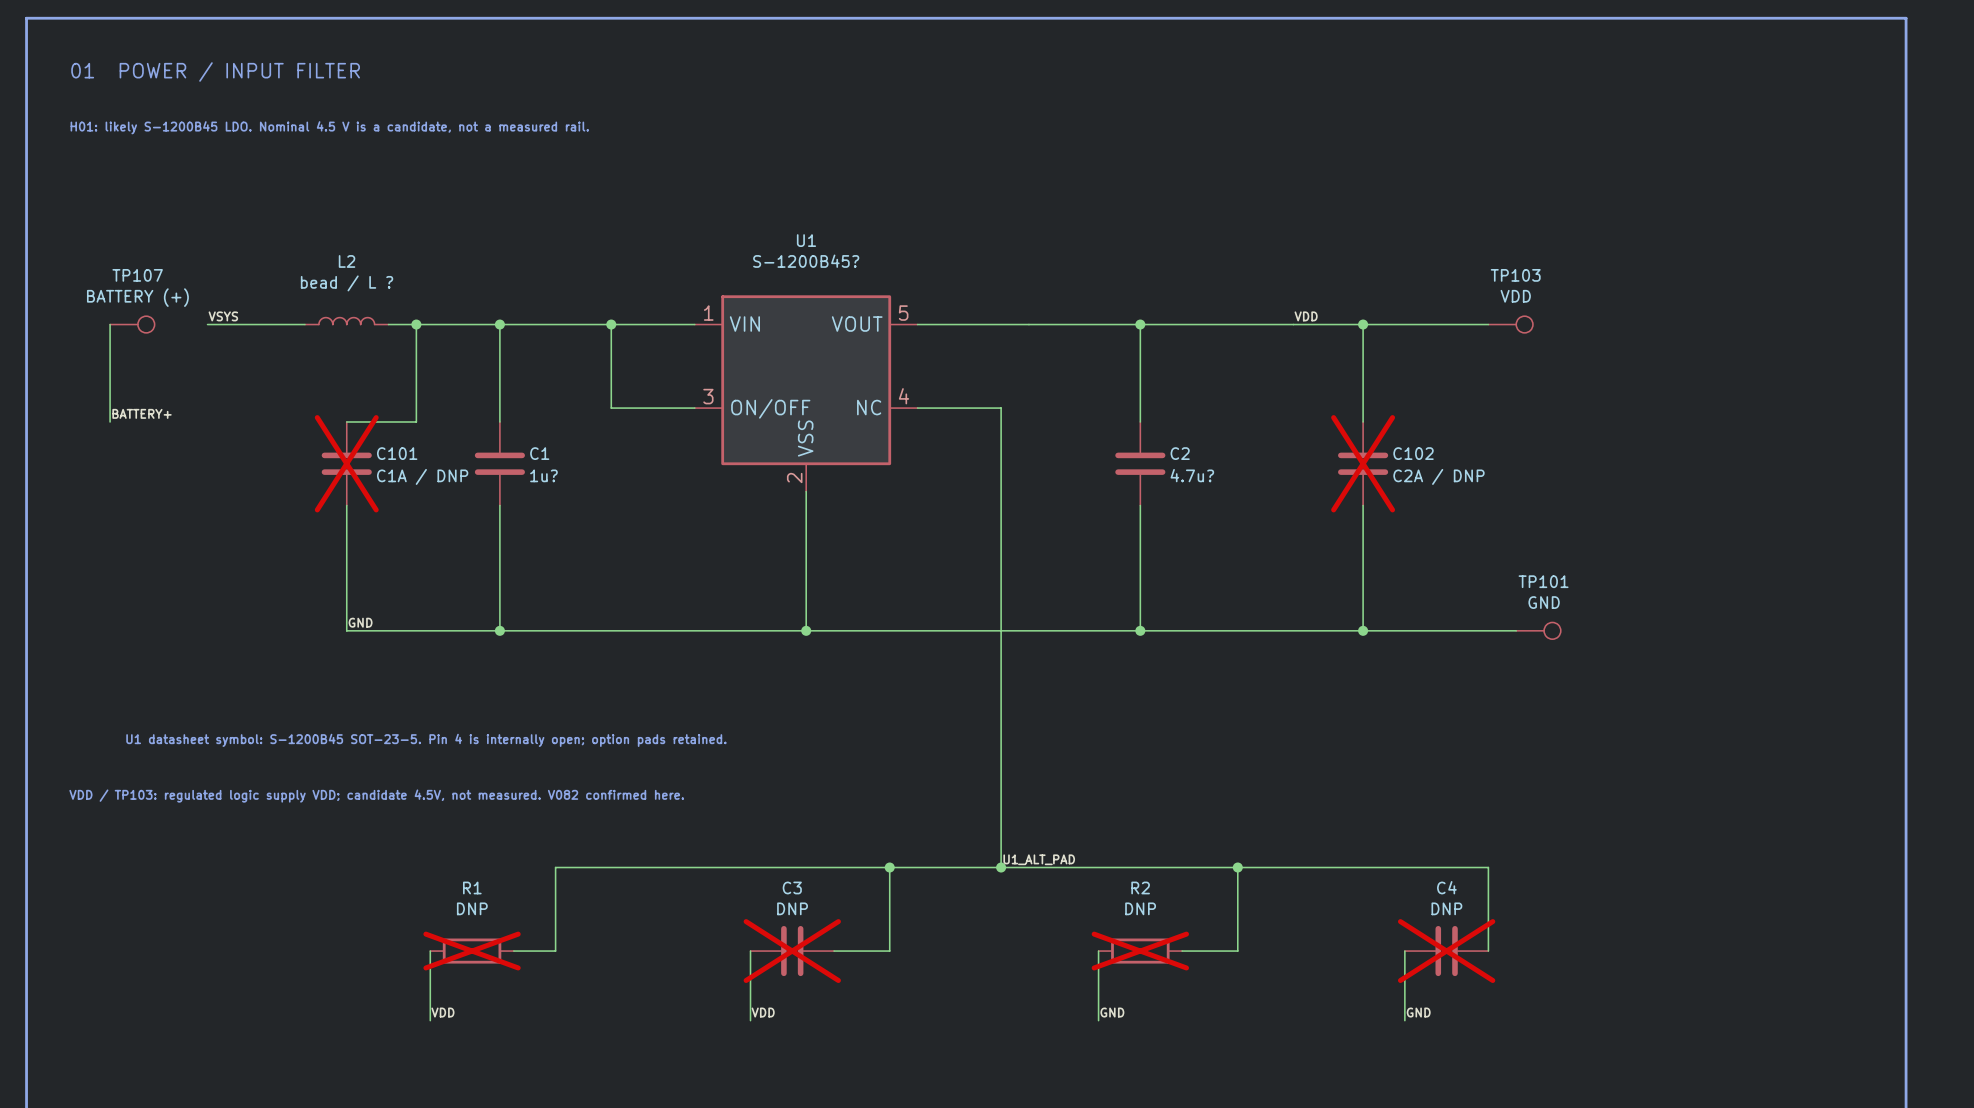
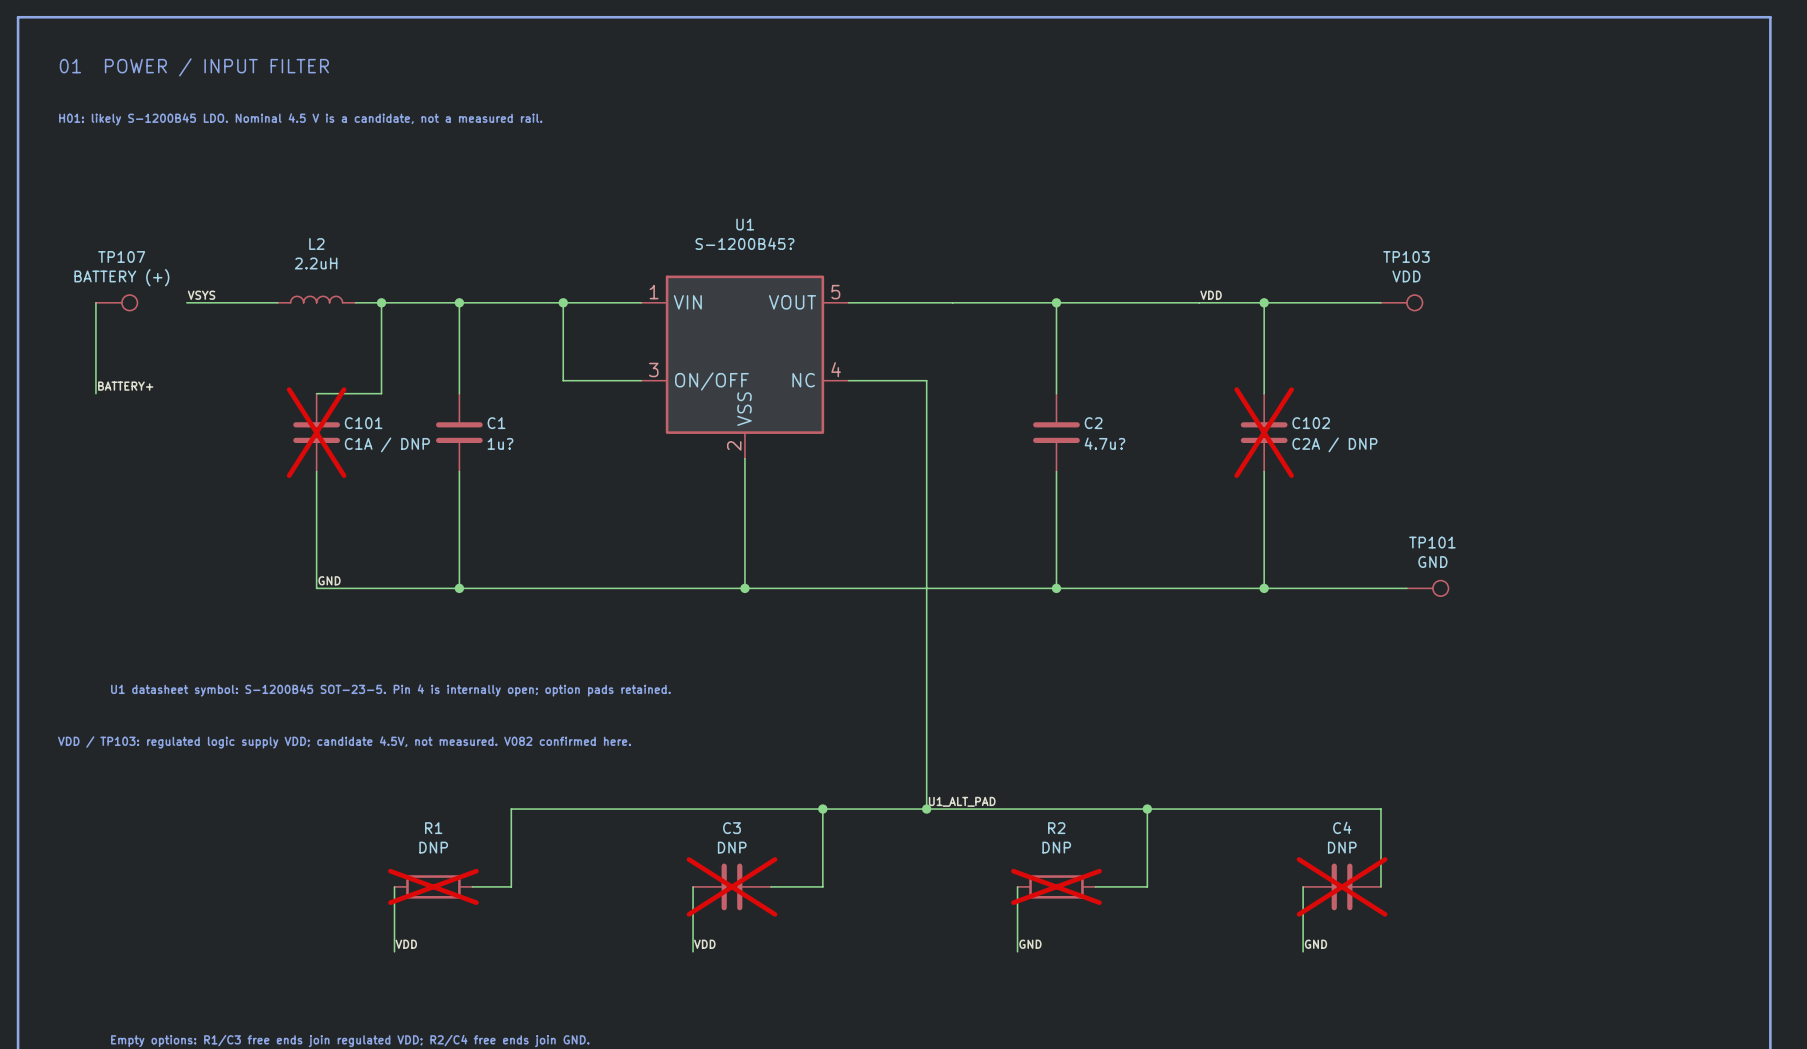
L2 value: bead / L ? (347, 283) -> 2.2uH (316, 263)

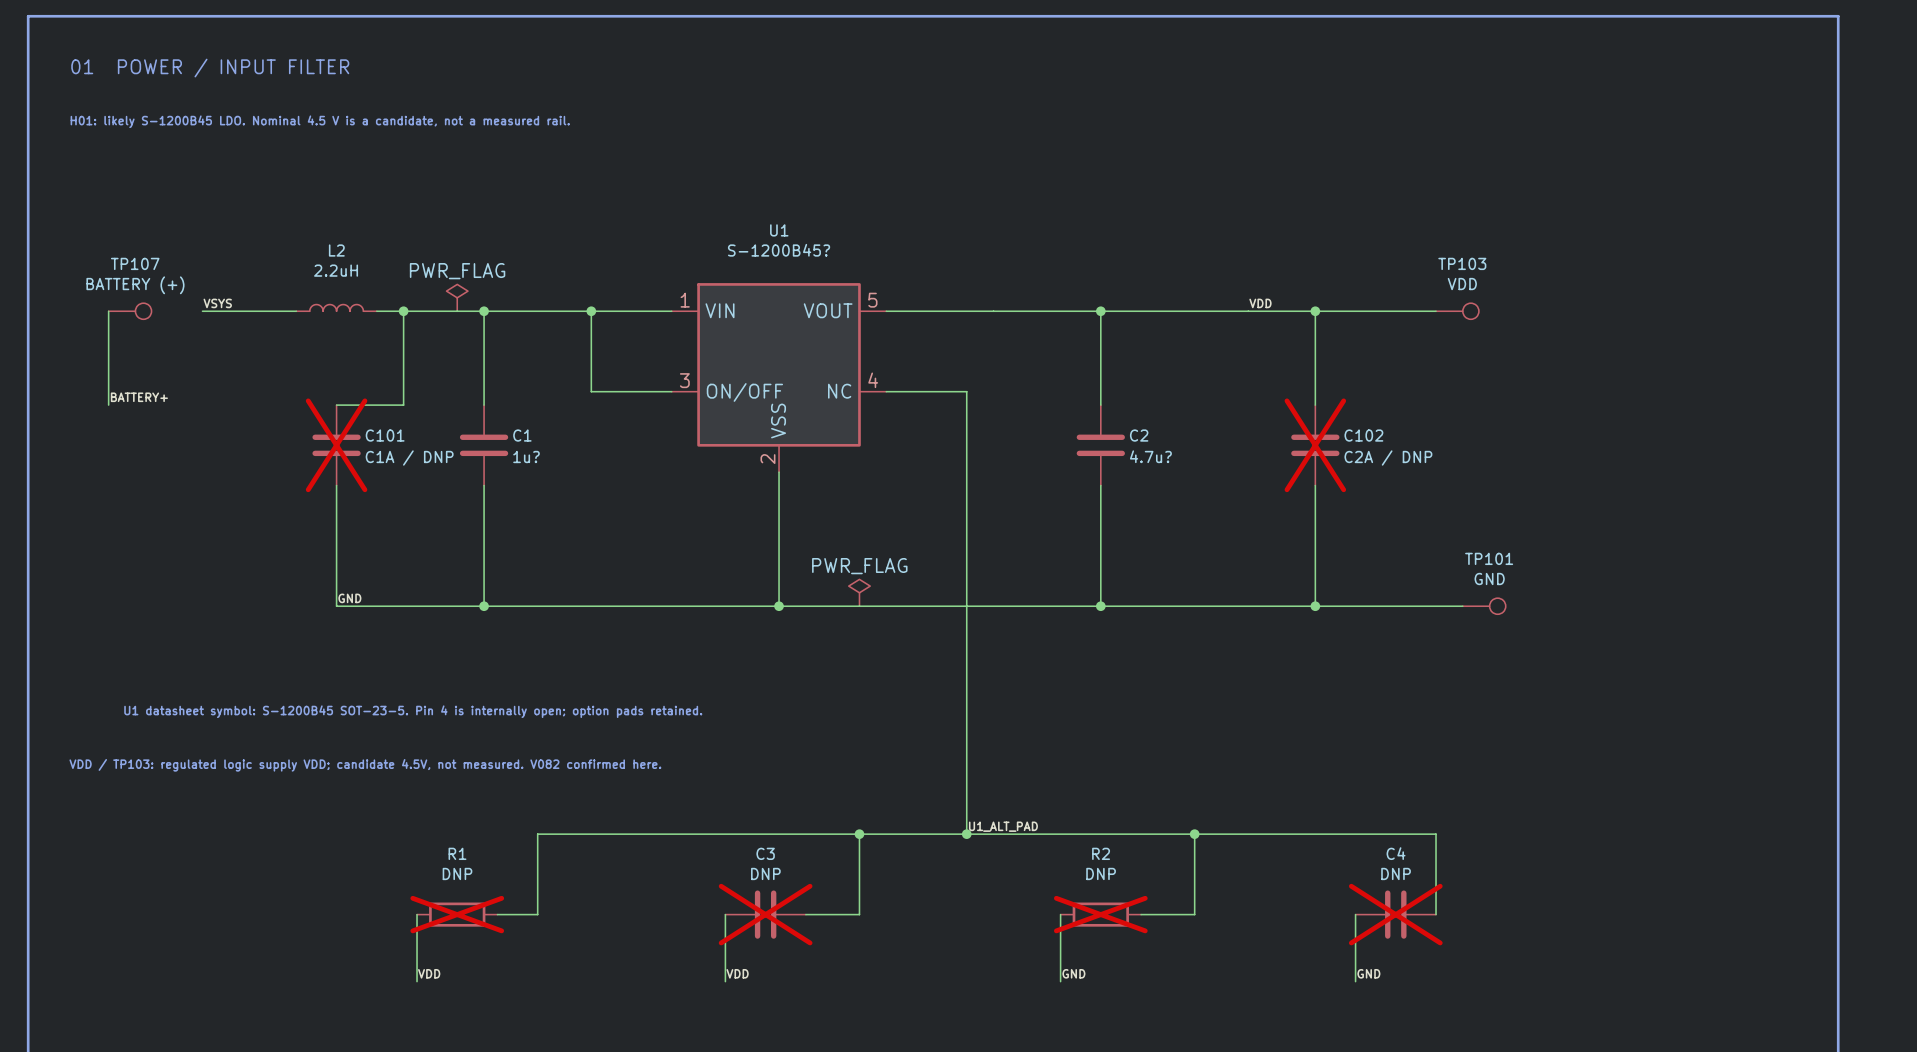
power symbol: none -> PWR_FLAG (457, 297)
power symbol: none -> PWR_FLAG (859, 592)

